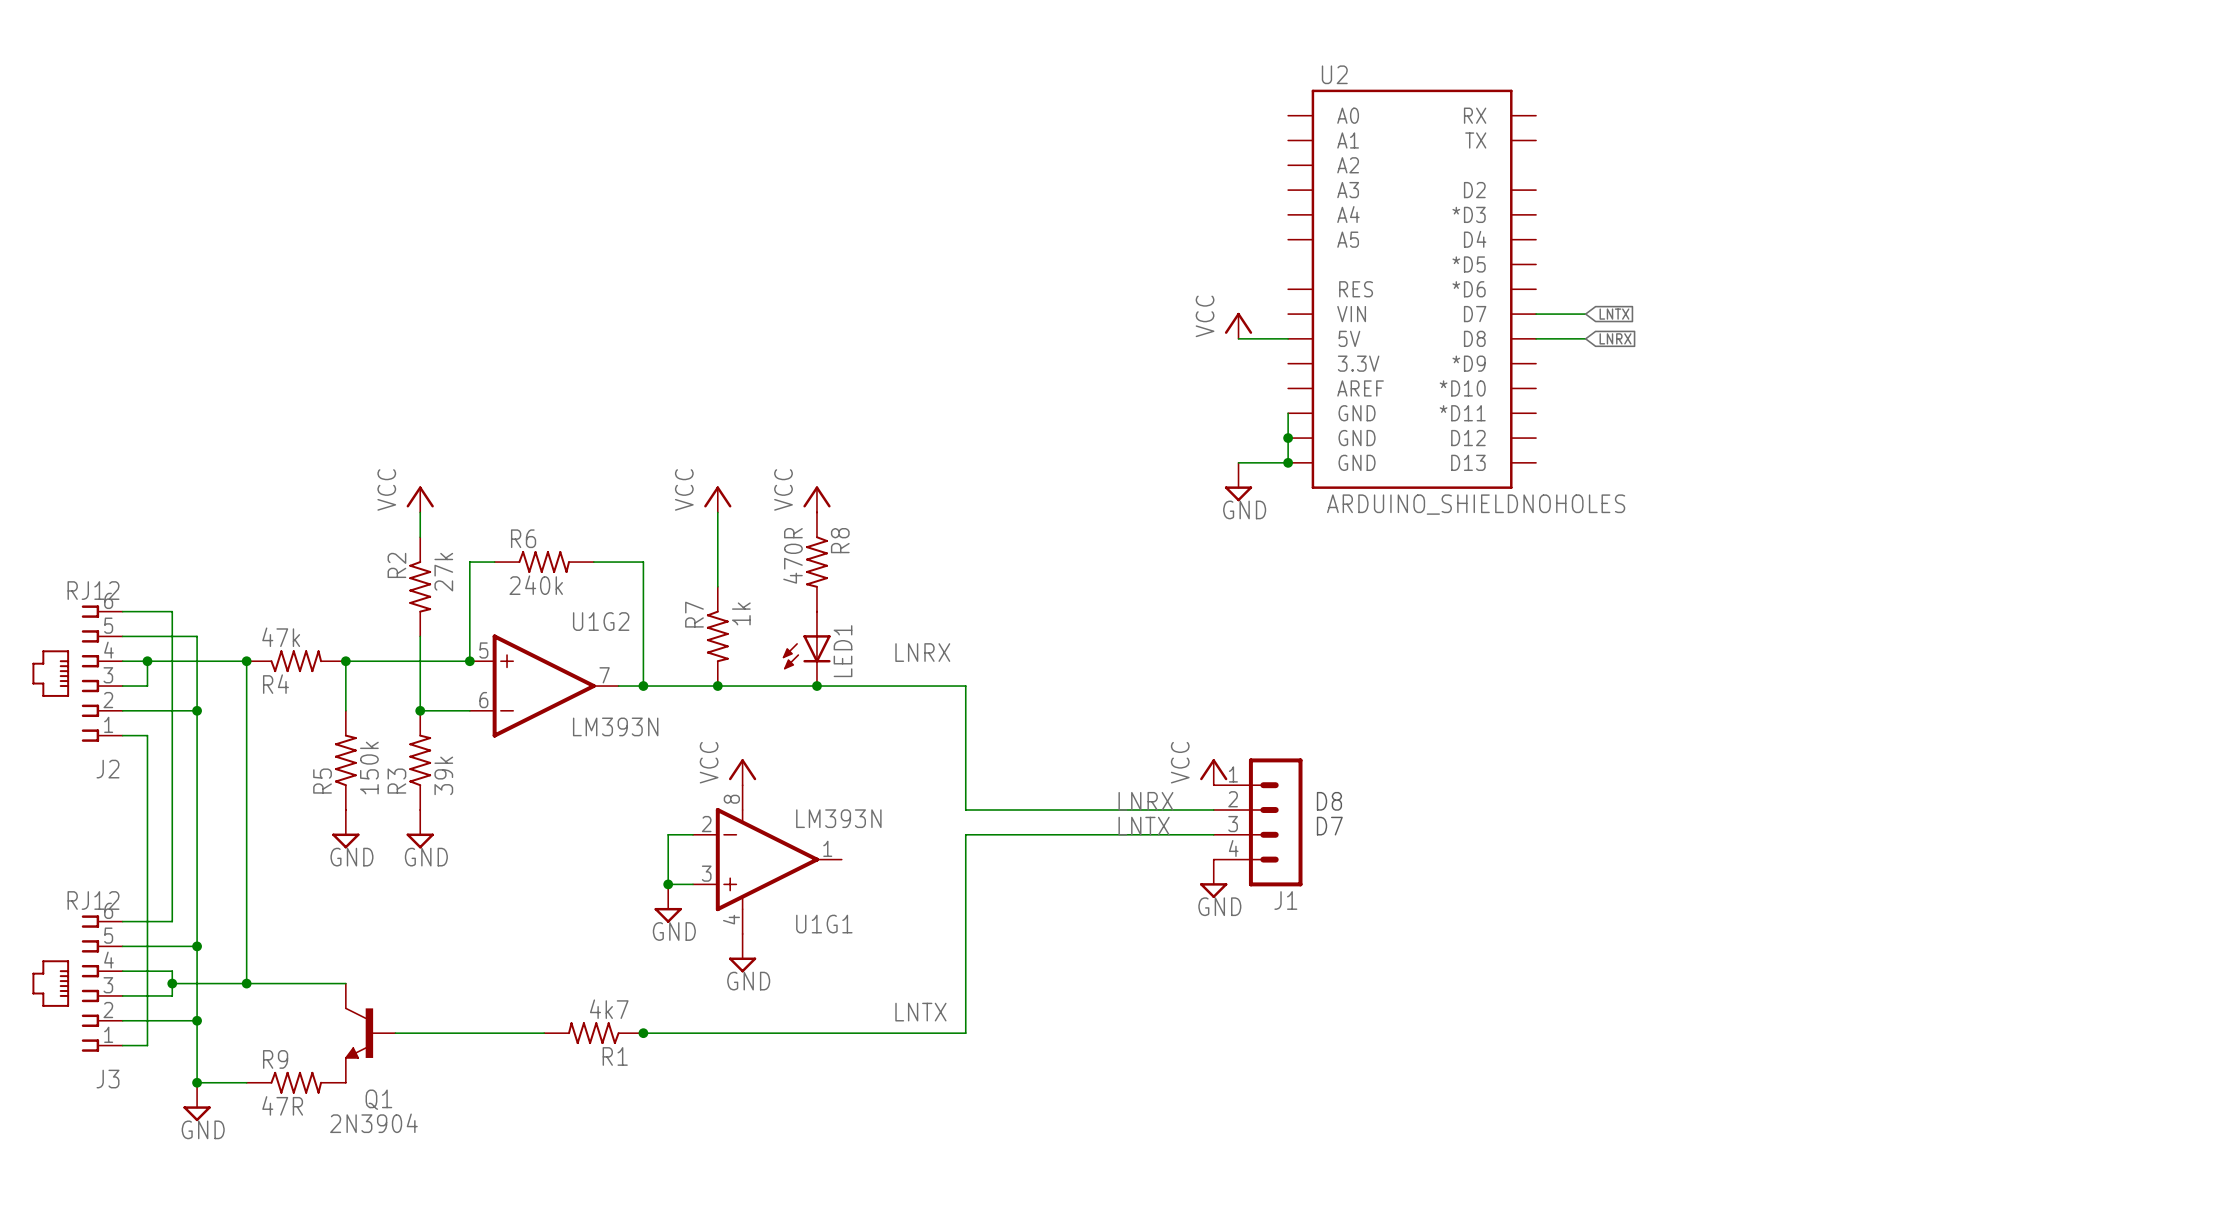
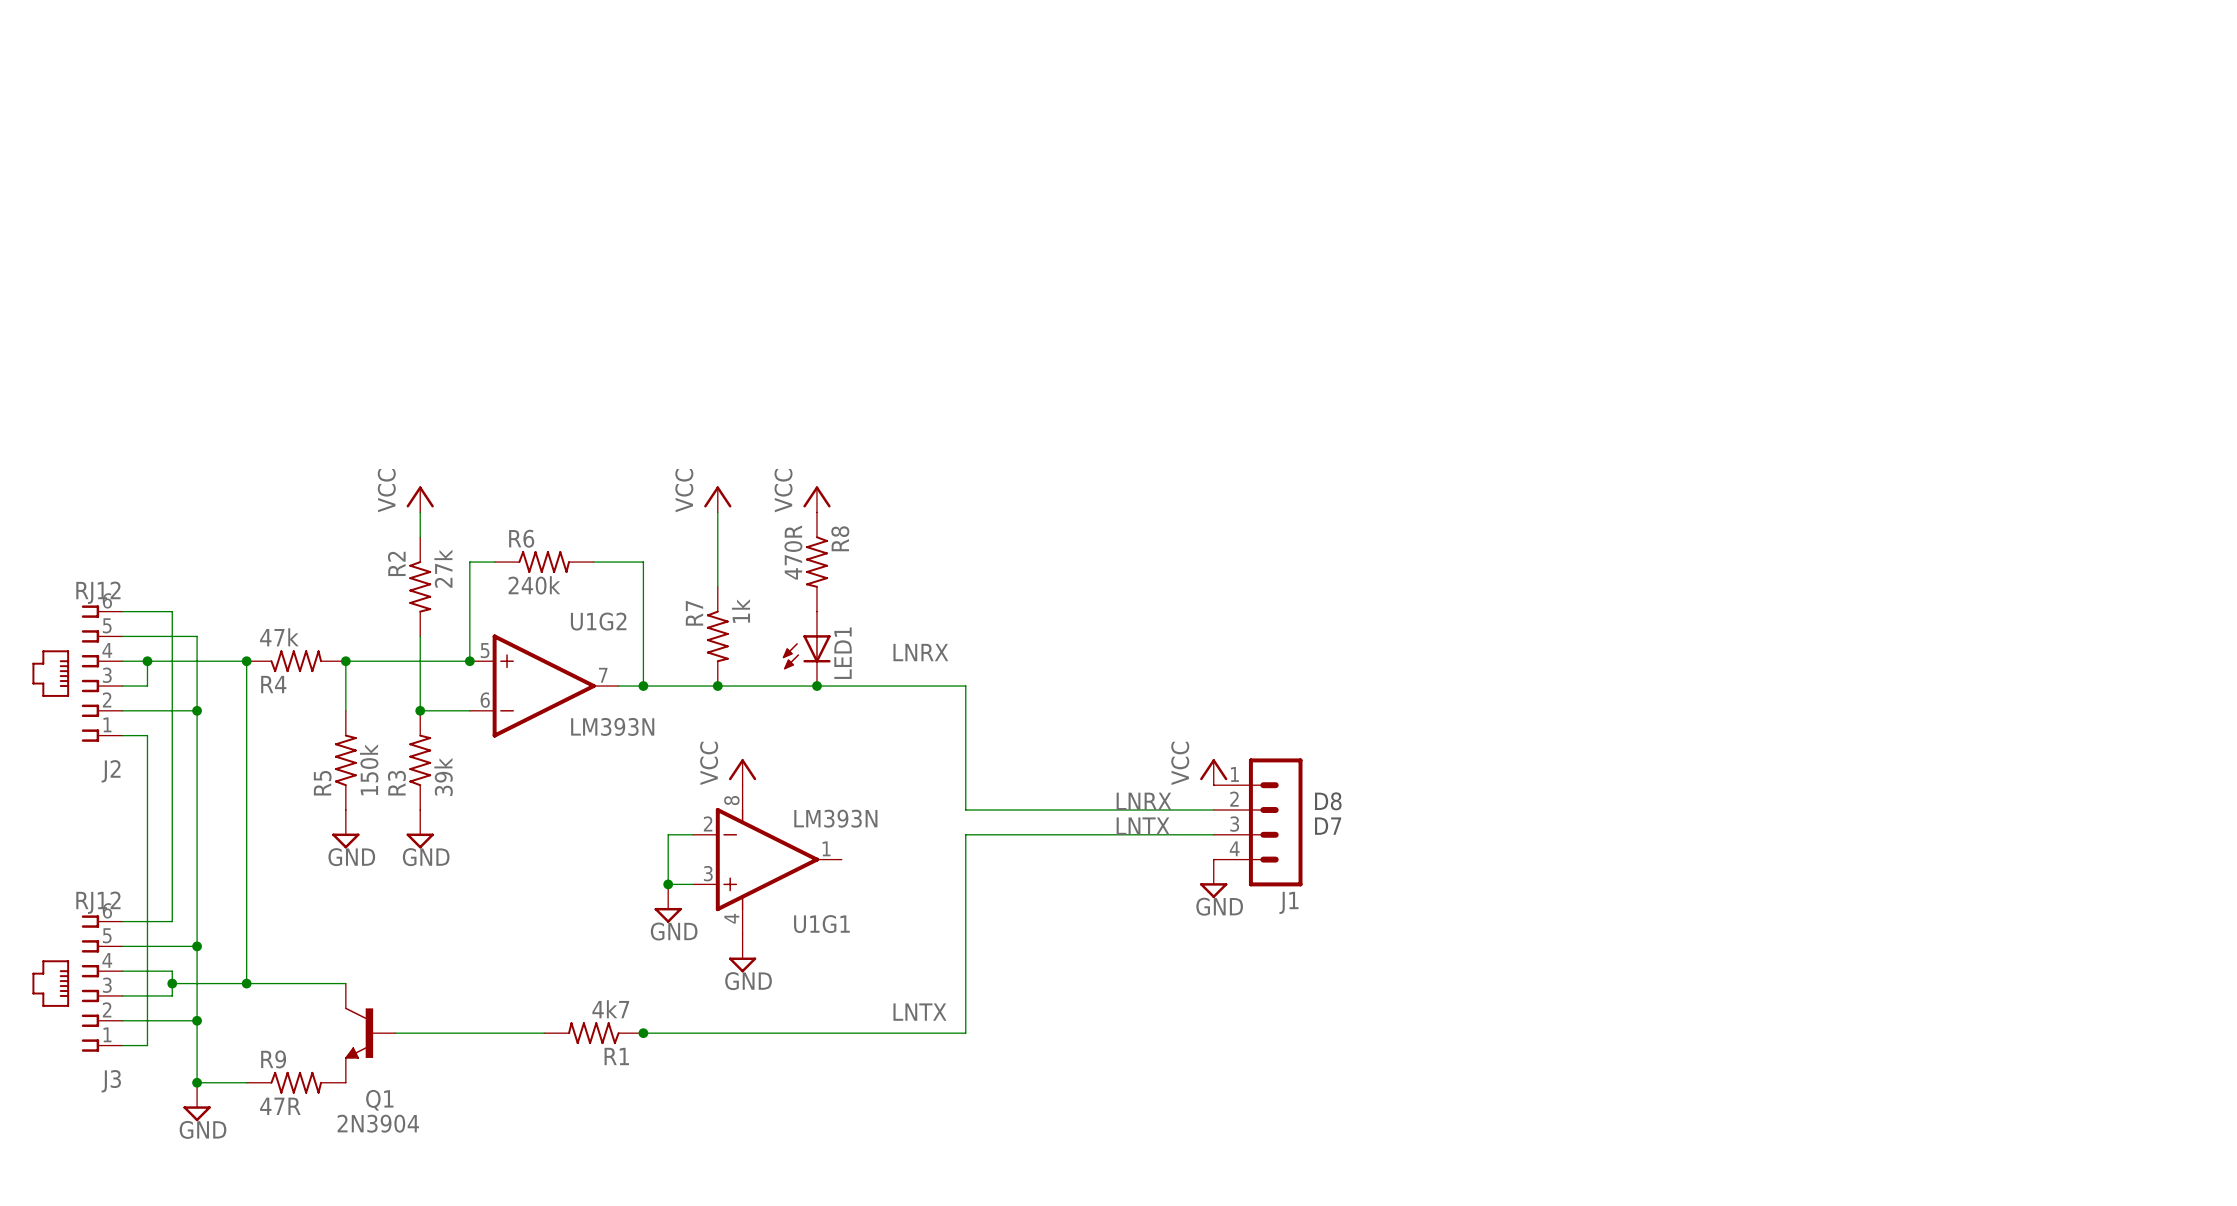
U2: ARDUINO_SHIELDNOHOLES (1412, 289) -> none
wire: (1536, 314) (1585, 314) -> none
global label: LNTX (1614, 314) -> none
power symbol: VCC (1238, 325) -> none
wire: (1238, 338) (1288, 338) -> none
wire: (1536, 338) (1585, 338) -> none
global label: LNRX (1615, 338) -> none
wire: (1288, 413) (1288, 462) (1238, 462) -> none
junction: (1288, 438) -> none
junction: (1288, 462) -> none
power symbol: GND (1238, 482) -> none

